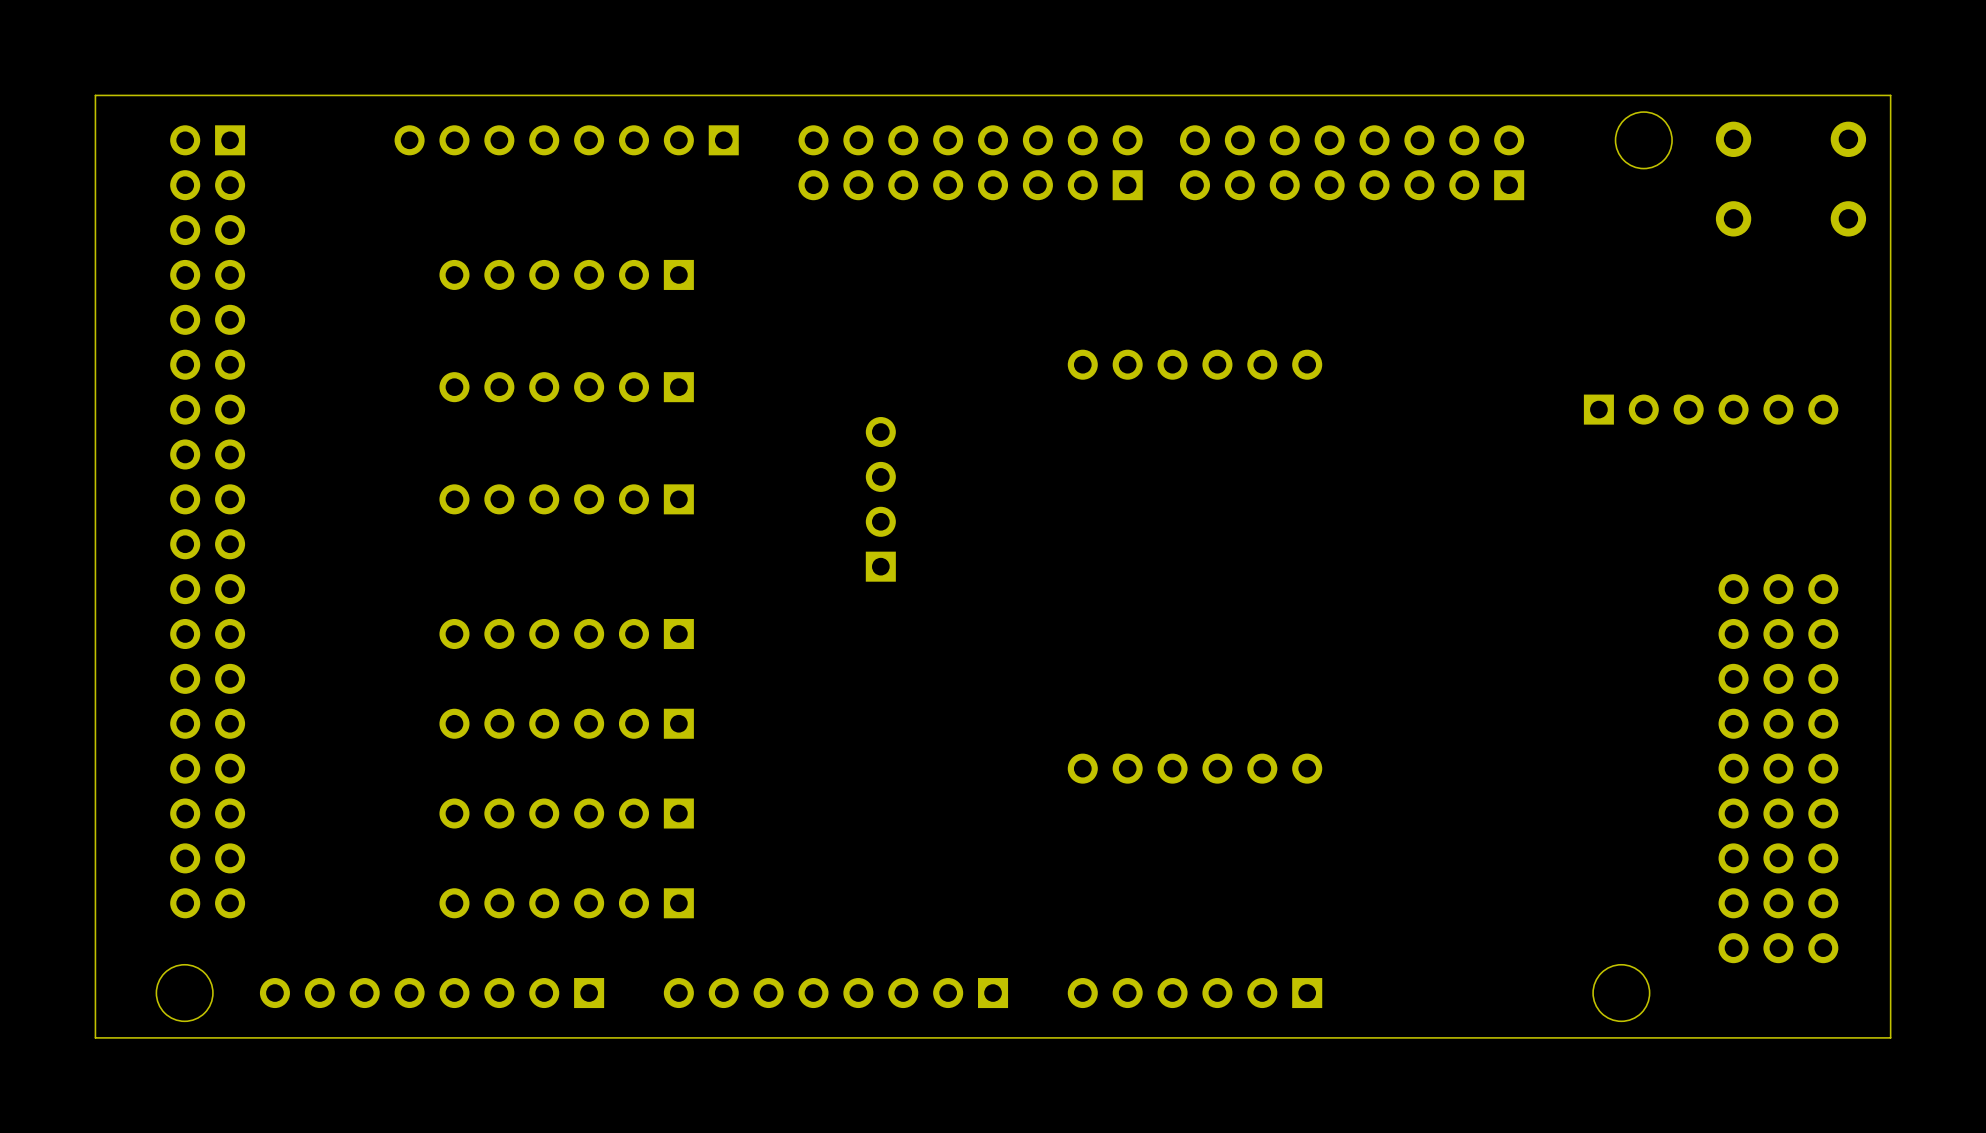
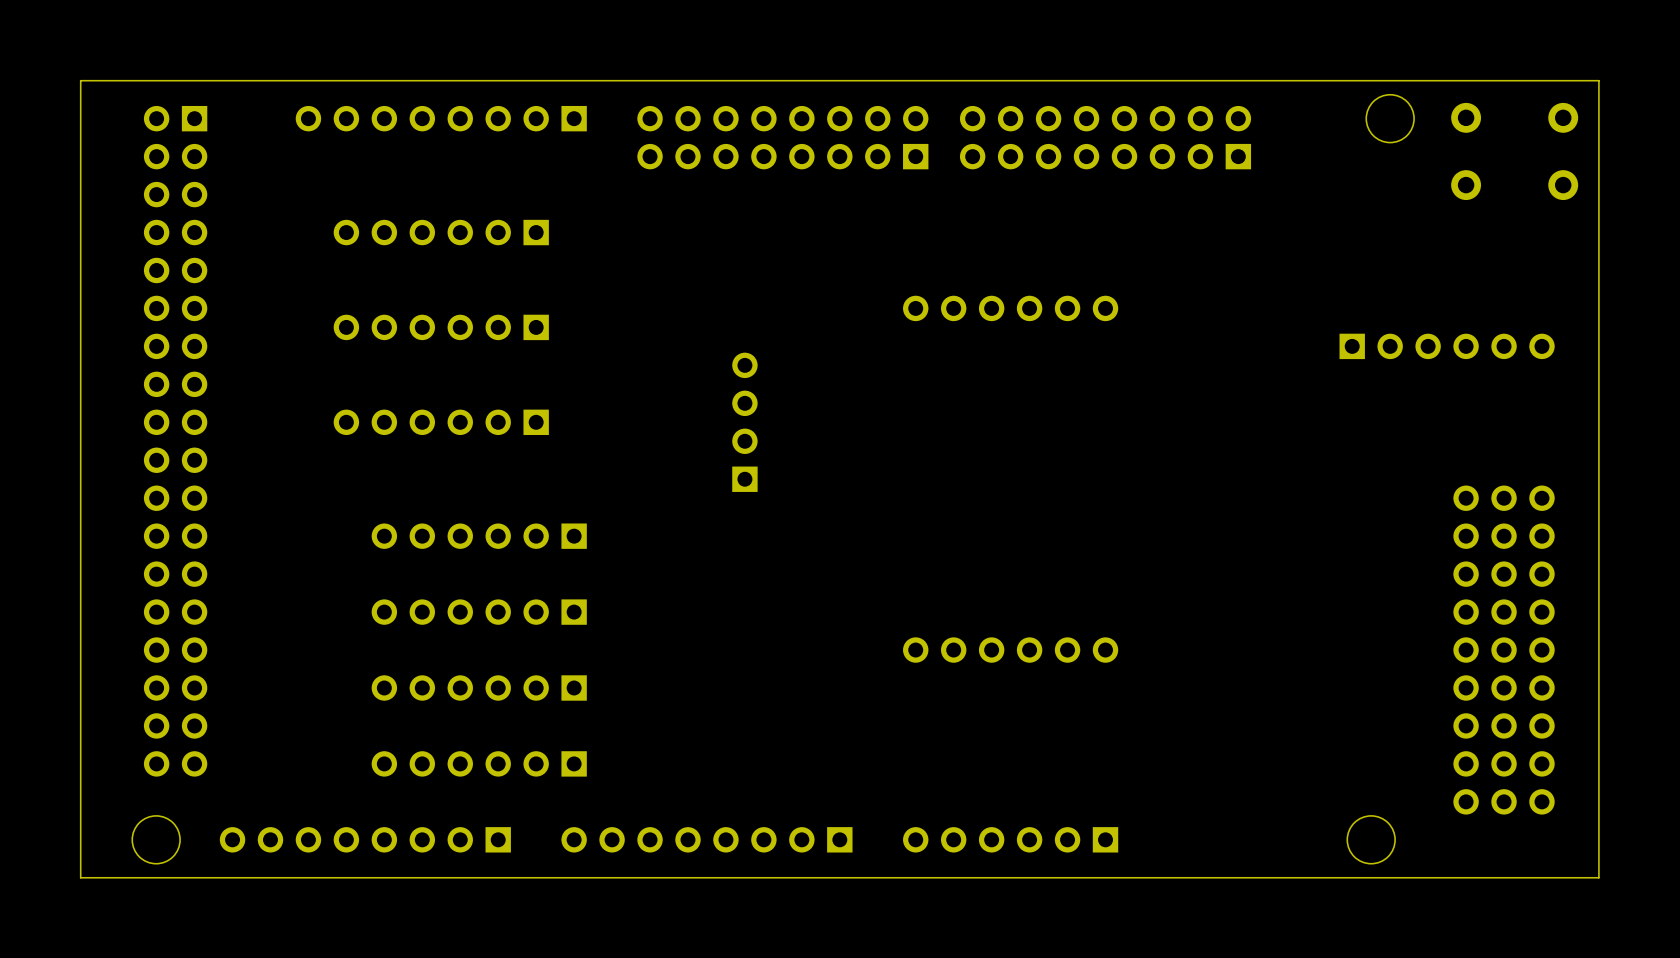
part position: (566, 140) -> (441, 118)
part position: (970, 162) -> (782, 137)
part position: (1352, 162) -> (1105, 137)
part position: (566, 274) -> (441, 232)
part position: (566, 387) -> (441, 327)
part position: (566, 499) -> (441, 422)

